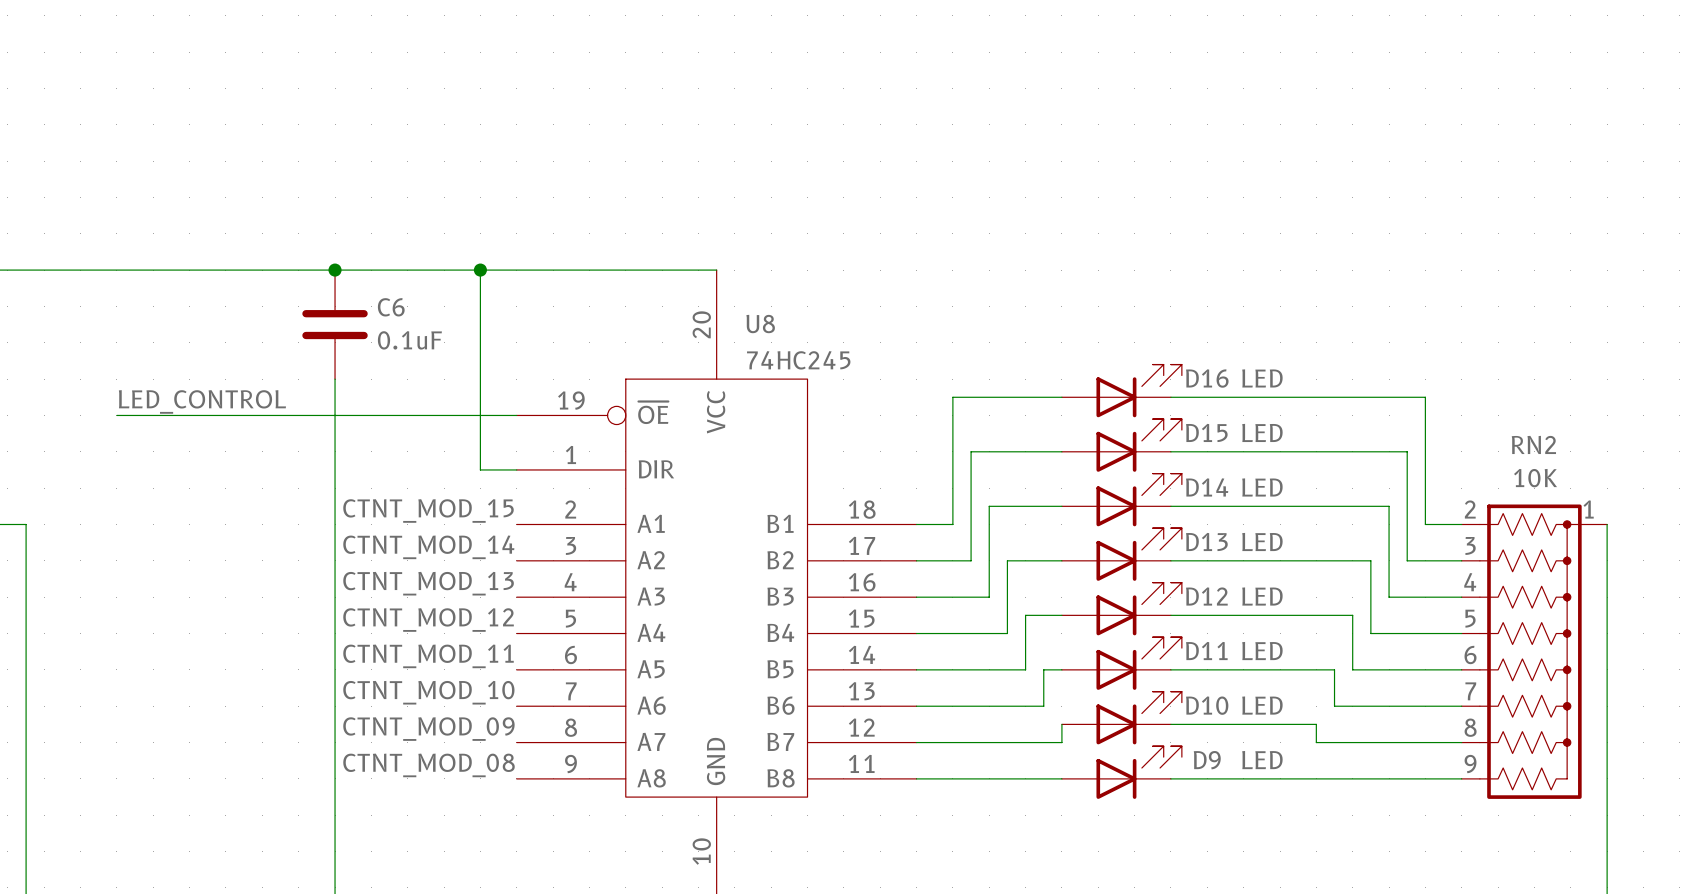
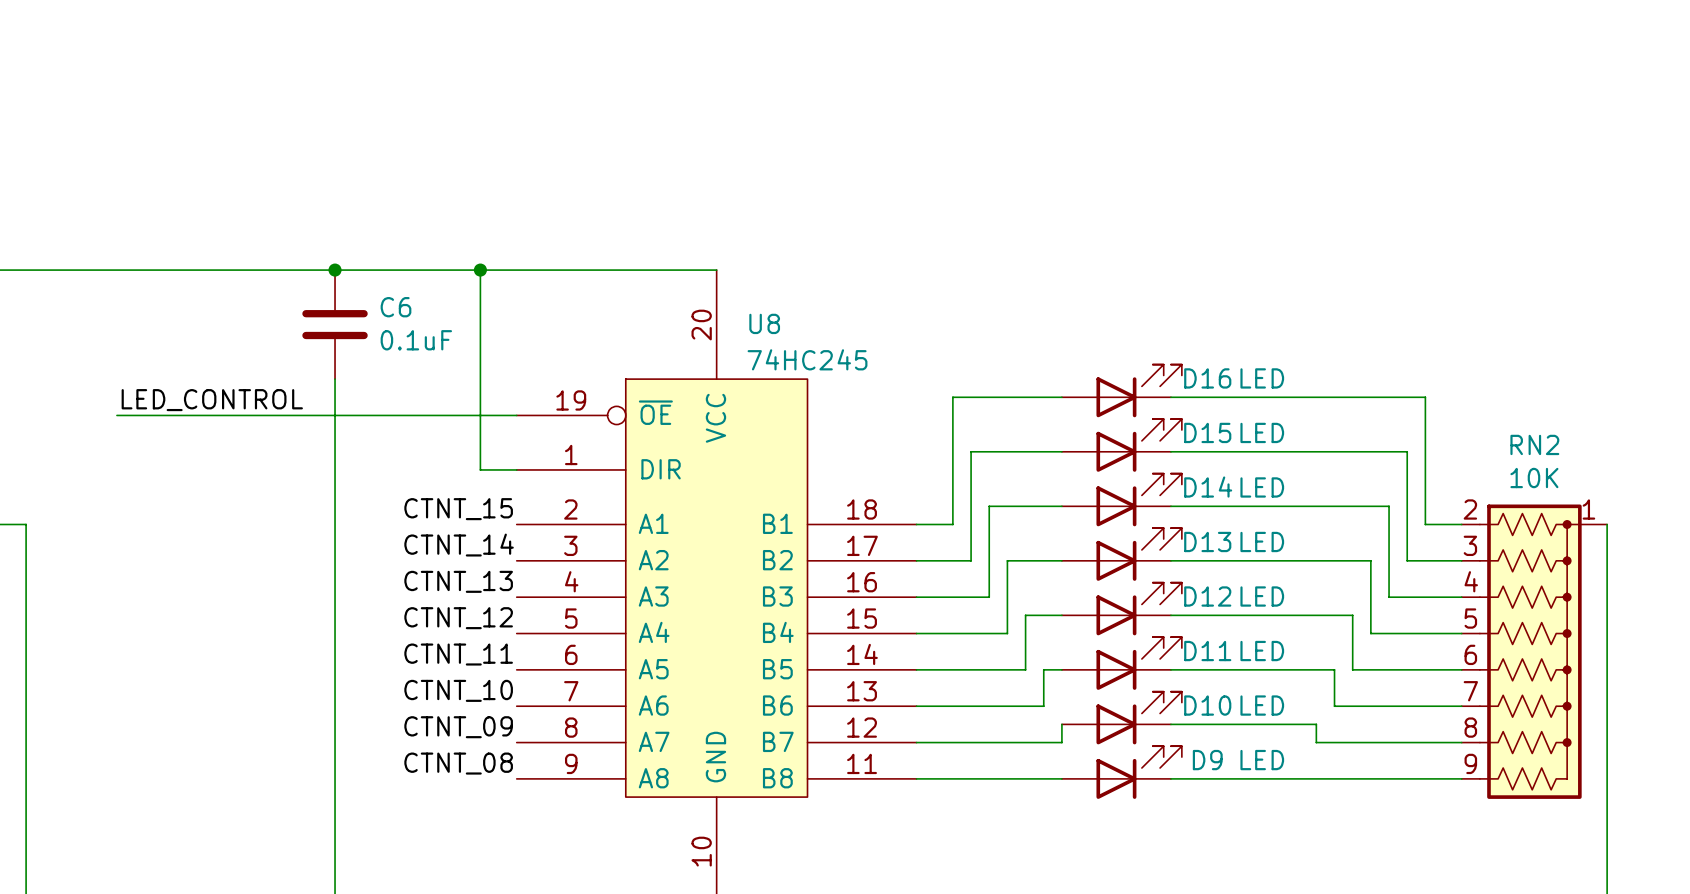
label: CTNT_MOD_15 (428, 510) -> CTNT_15 (458, 509)
label: CTNT_MOD_14 (428, 547) -> CTNT_14 (459, 545)
label: CTNT_MOD_13 (428, 583) -> CTNT_13 (458, 581)
label: CTNT_MOD_12 (428, 620) -> CTNT_12 (458, 618)
label: CTNT_MOD_11 (428, 656) -> CTNT_11 (458, 654)
label: CTNT_MOD_10 (428, 692) -> CTNT_10 (458, 690)
label: CTNT_MOD_09 (428, 729) -> CTNT_09 (458, 727)
label: CTNT_MOD_08 (429, 765) -> CTNT_08 (458, 763)

